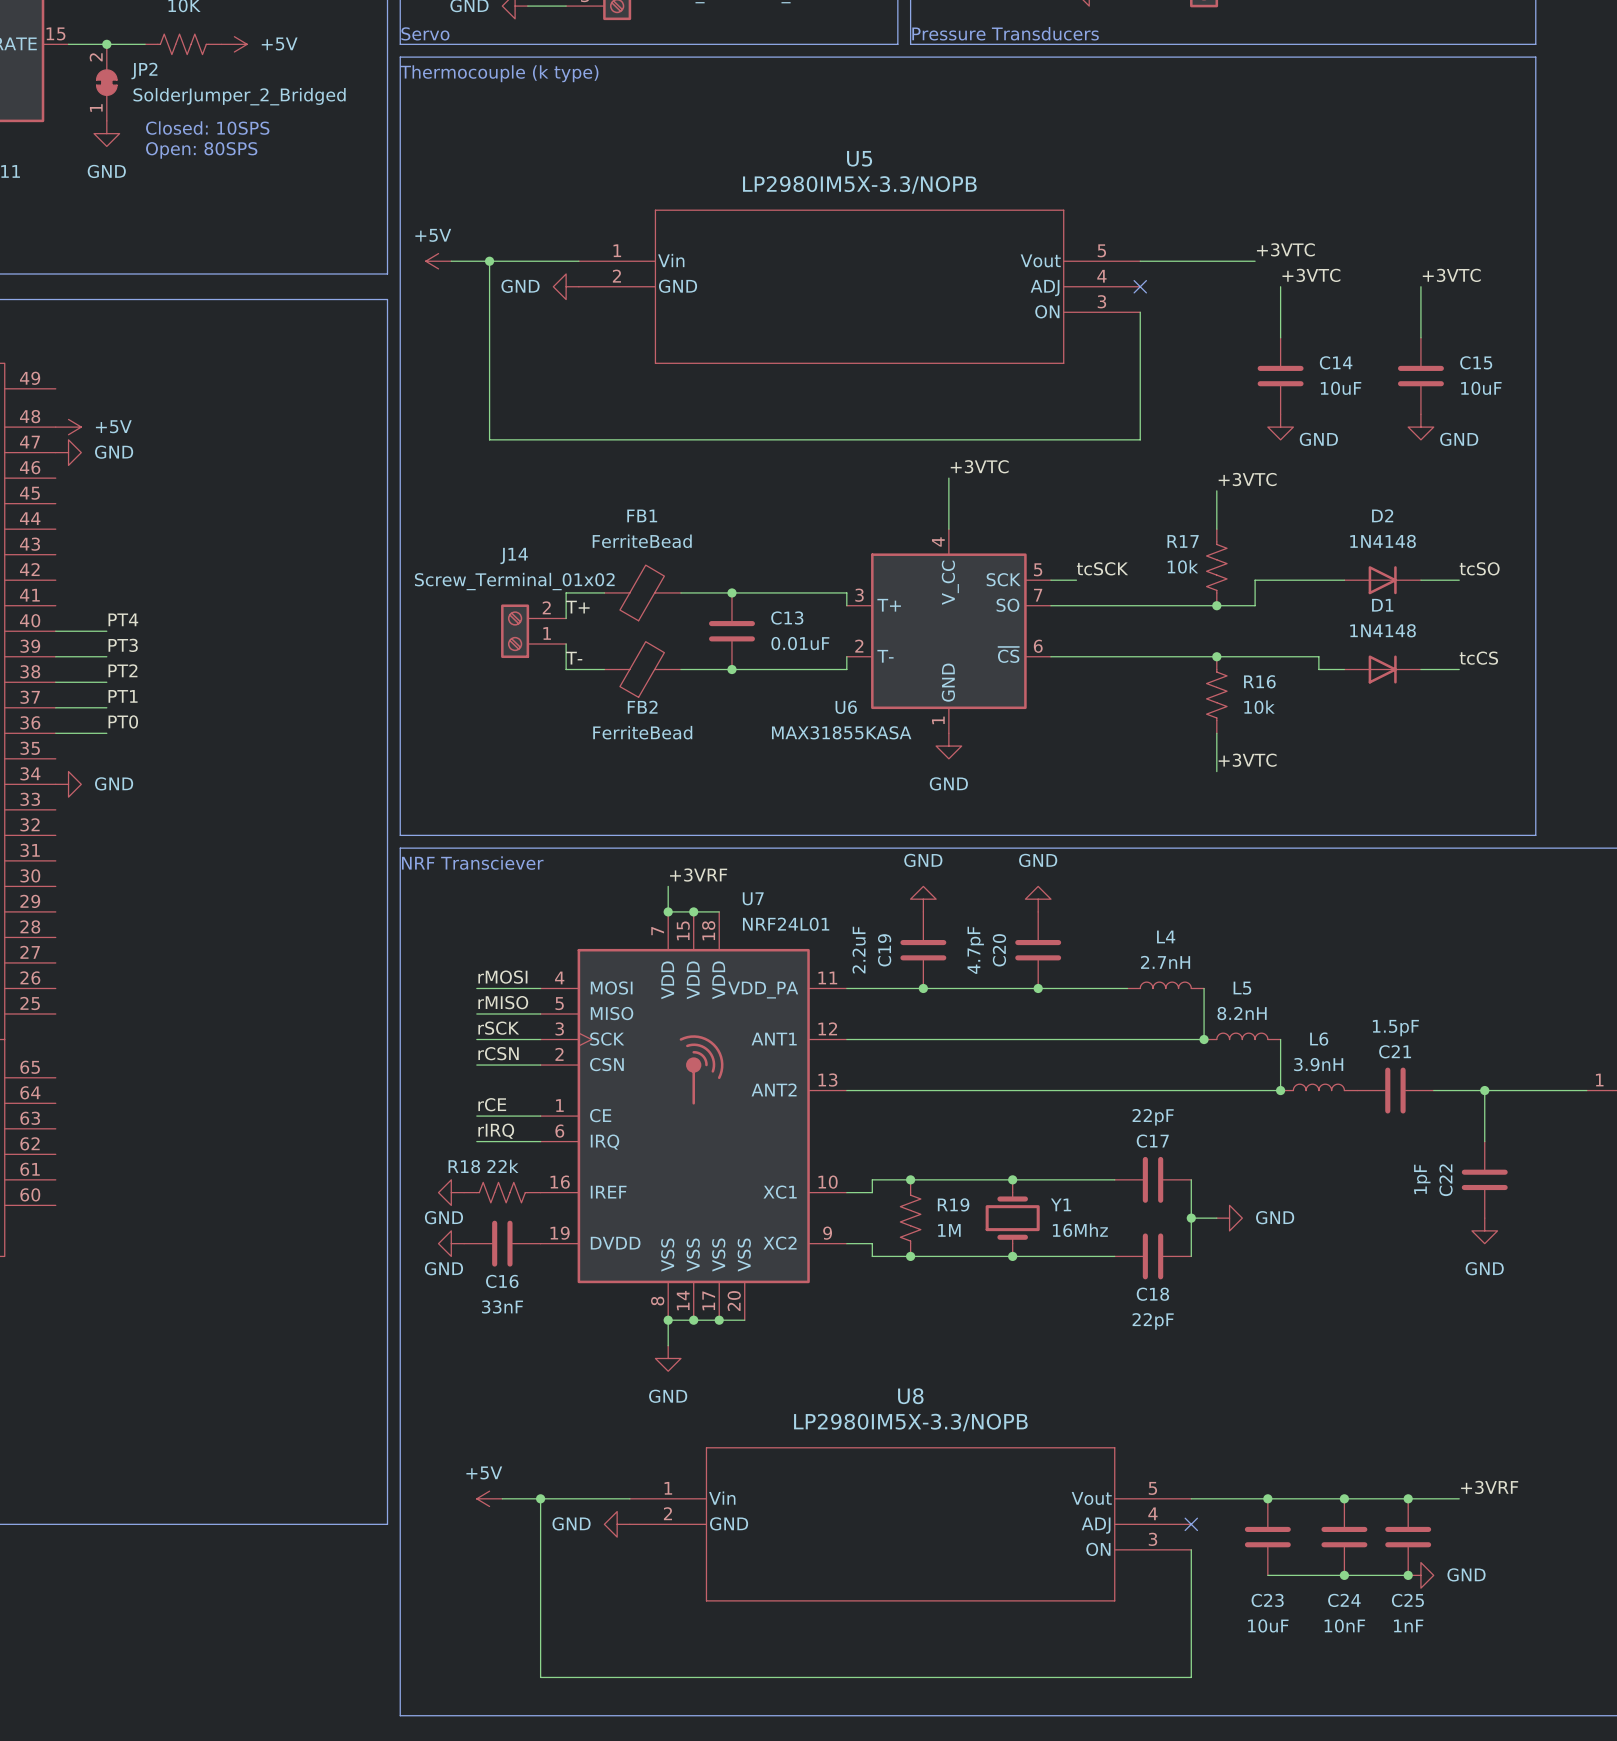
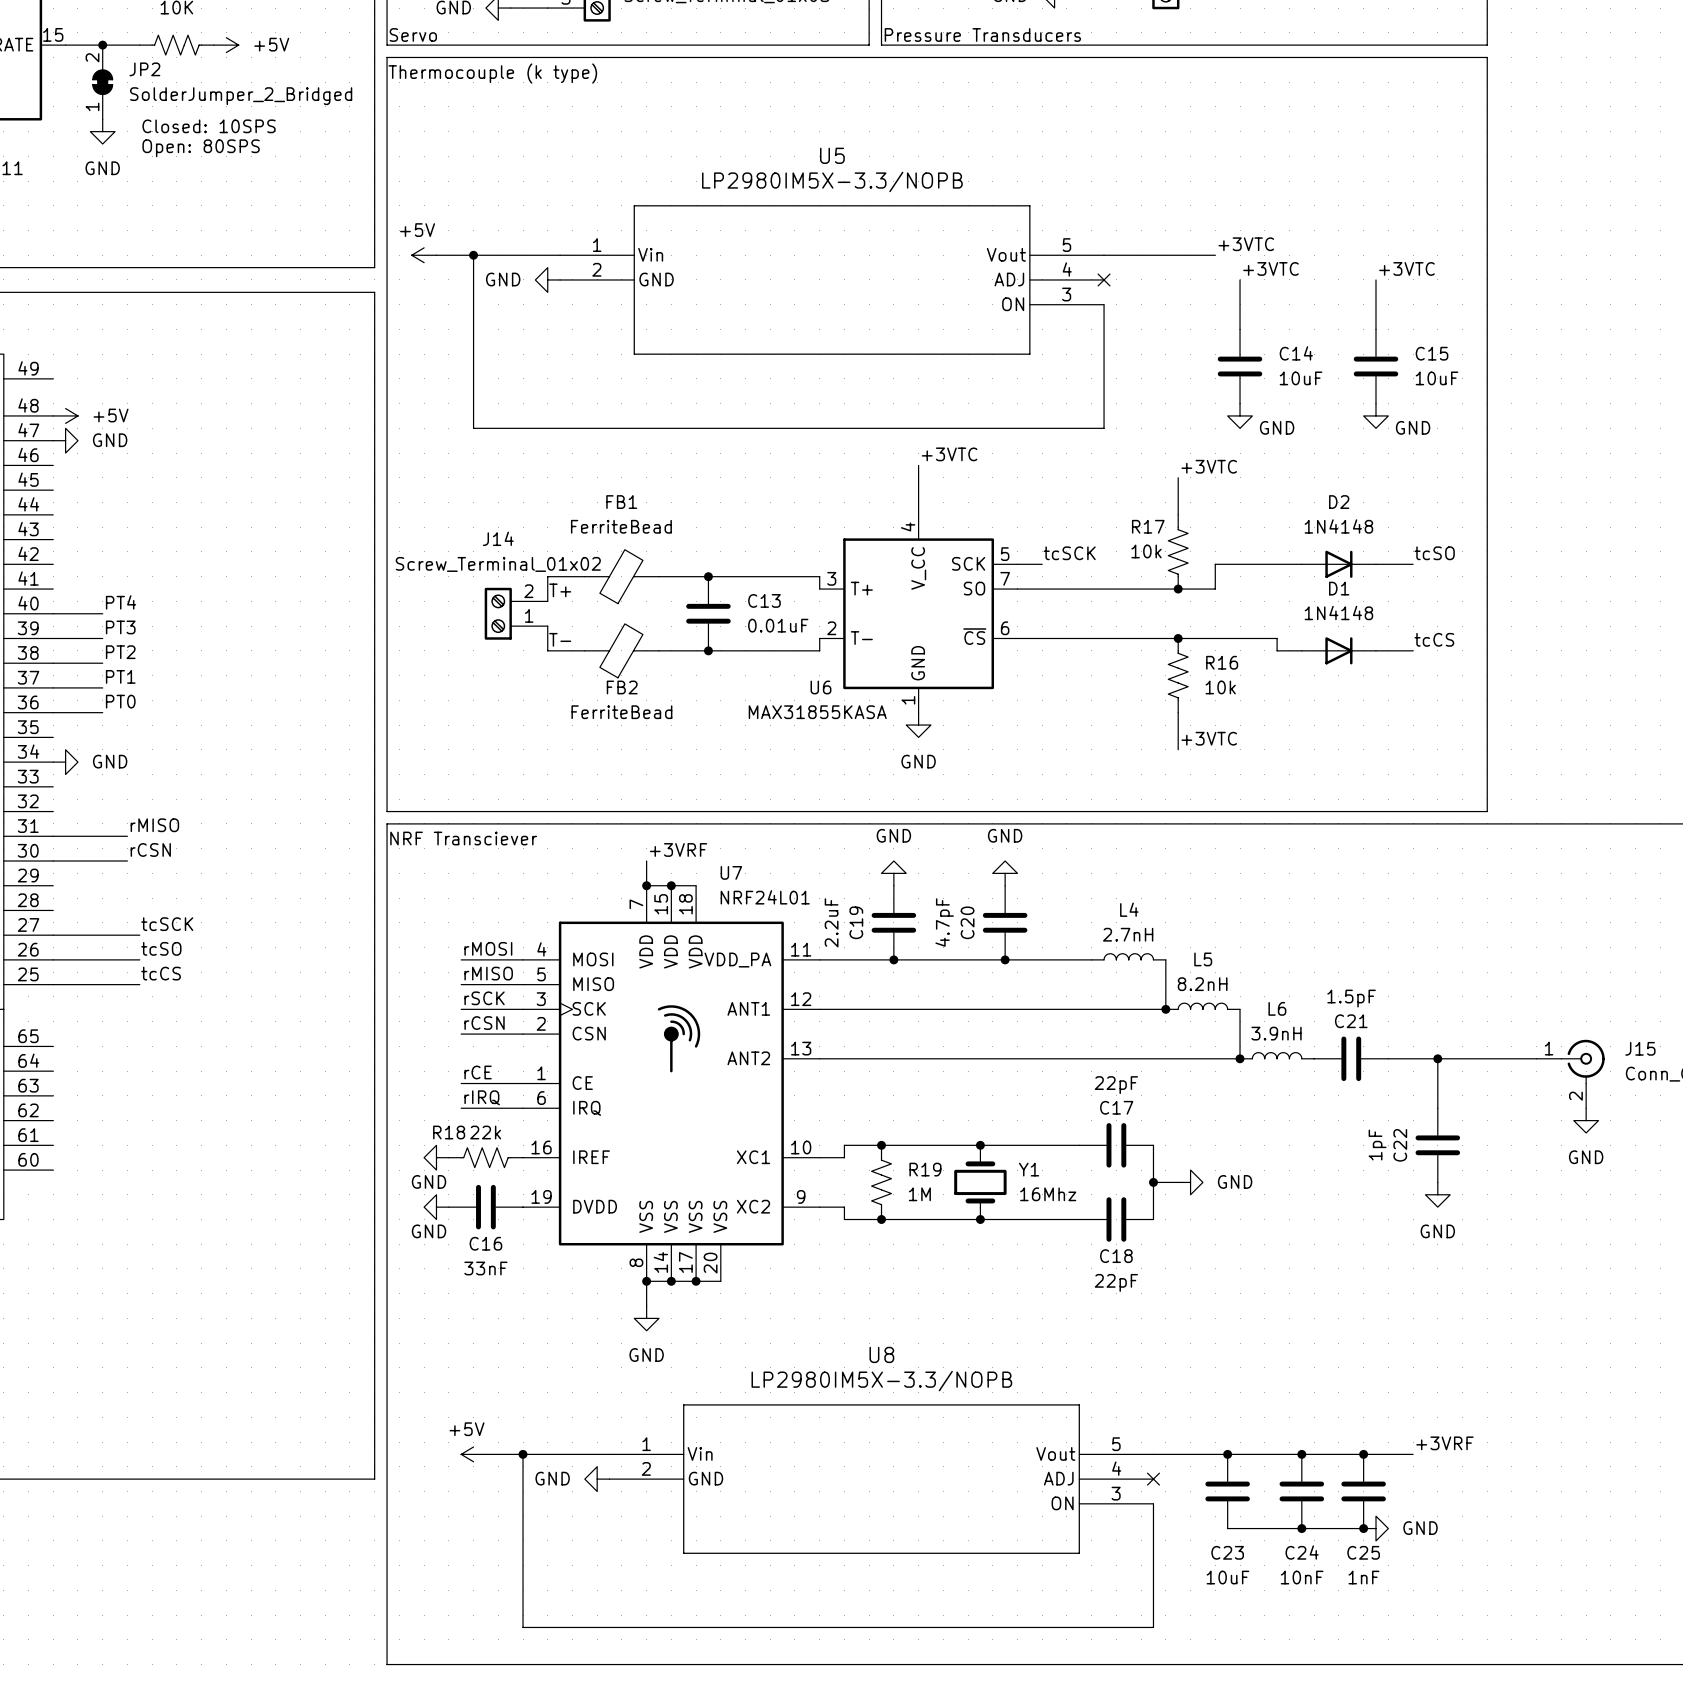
label: none -> rMISO (154, 825)
wire: none -> (53, 836) (127, 836)
label: none -> rCSN (150, 849)
wire: none -> (53, 861) (127, 861)
label: none -> tcSCK (167, 924)
wire: none -> (53, 935) (139, 935)
label: none -> tcSO (161, 948)
wire: none -> (53, 959) (139, 959)
label: none -> tcCS (161, 973)
wire: none -> (53, 984) (139, 984)

